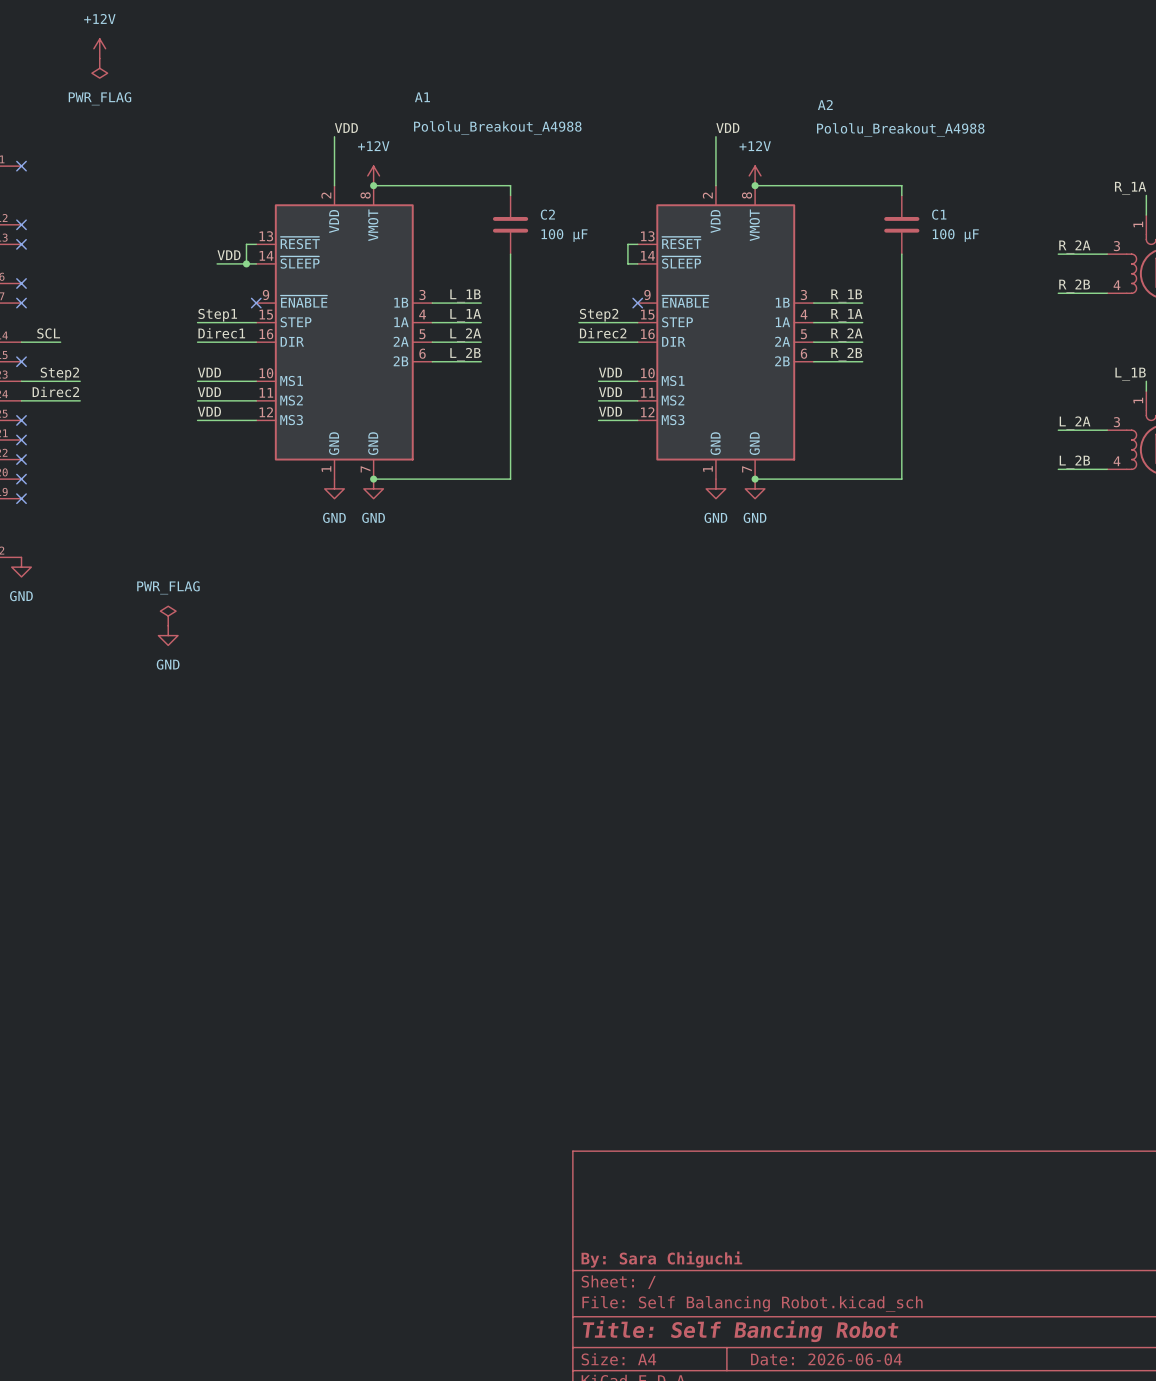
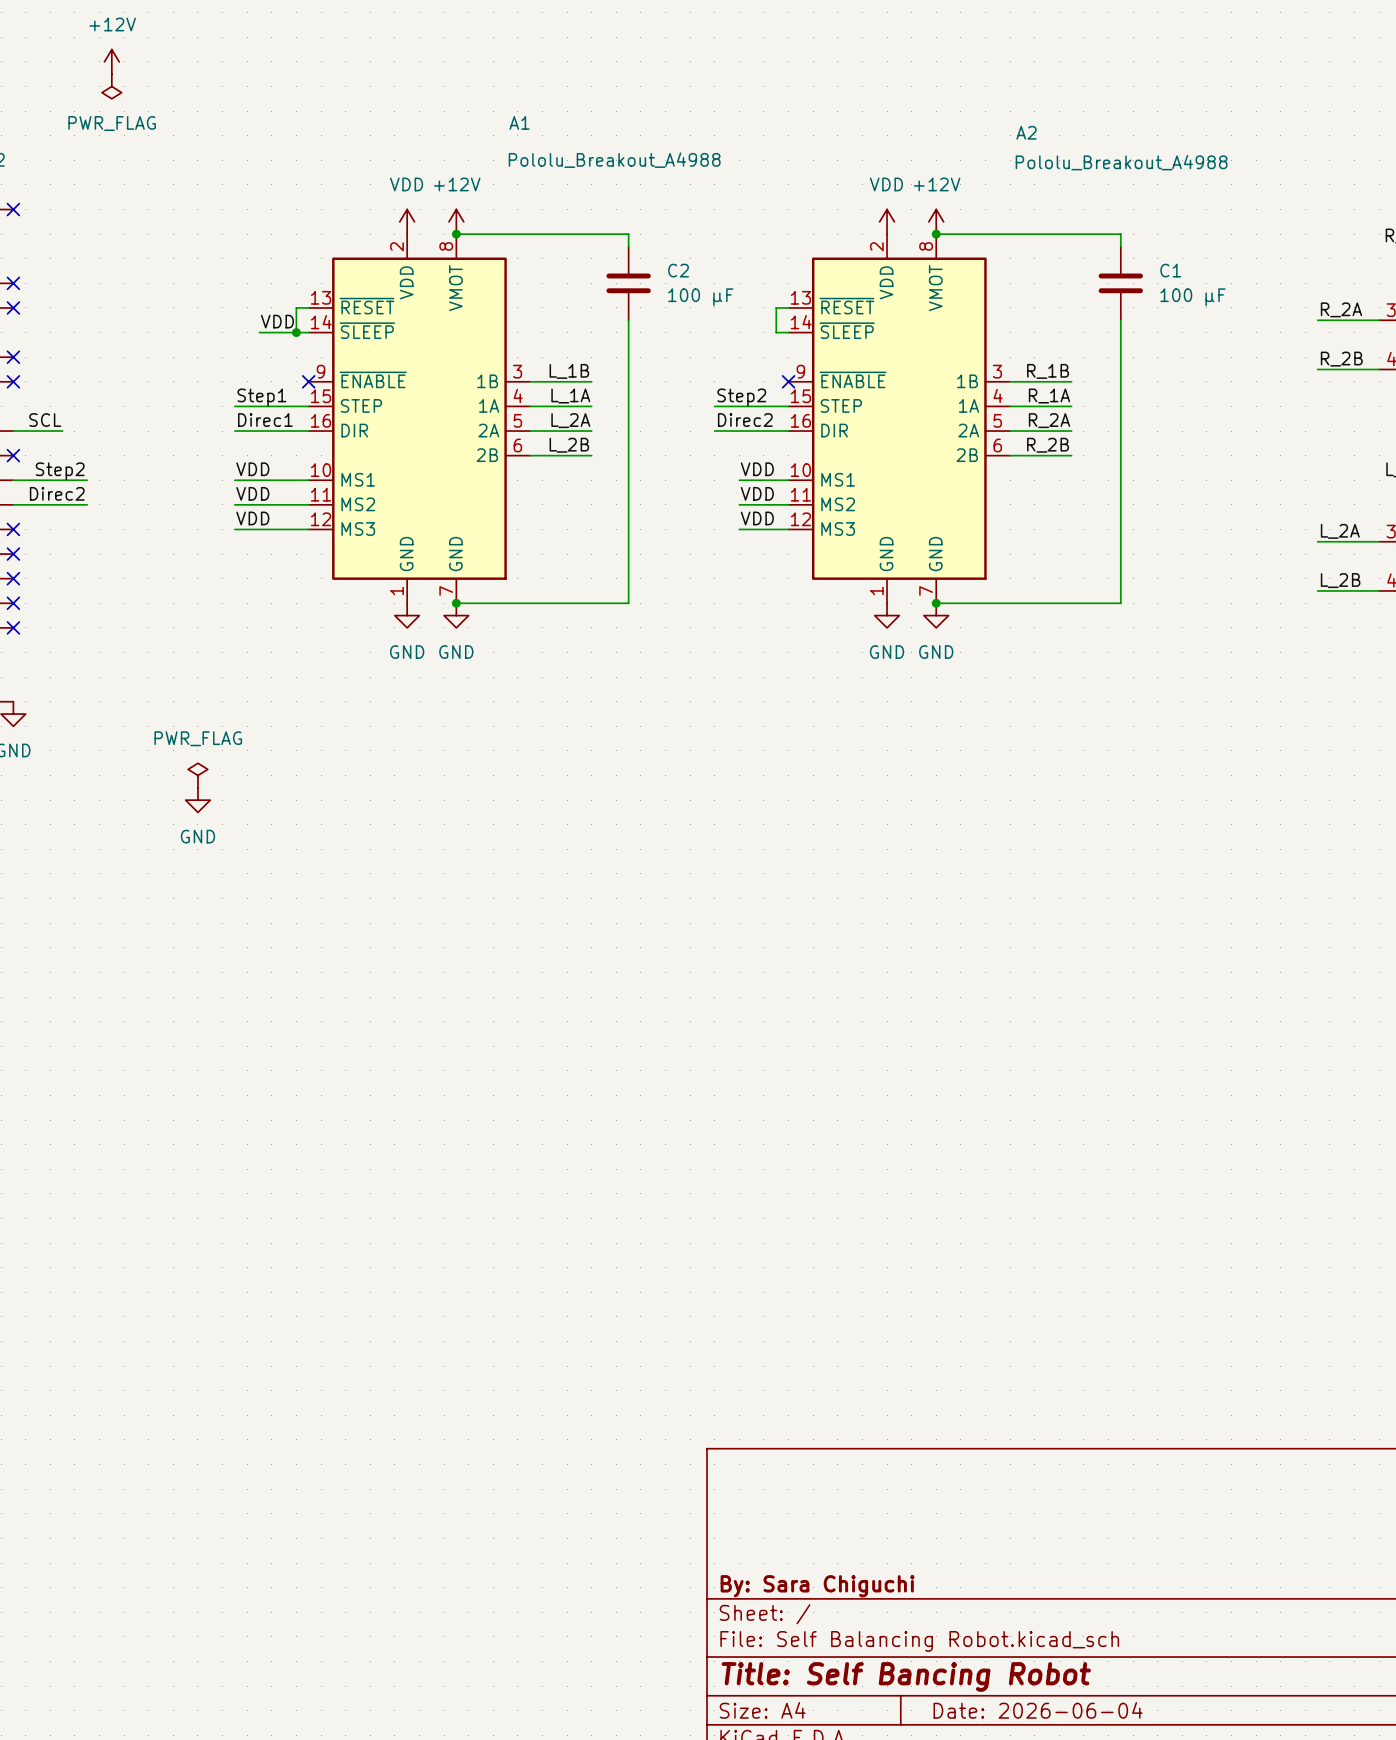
label: VDD (346, 128) -> none
label: VDD (727, 128) -> none
wire: (334, 136) (334, 185) -> none
wire: (715, 136) (715, 185) -> none
power symbol: none -> VDD (407, 221)
power symbol: none -> VDD (887, 221)

